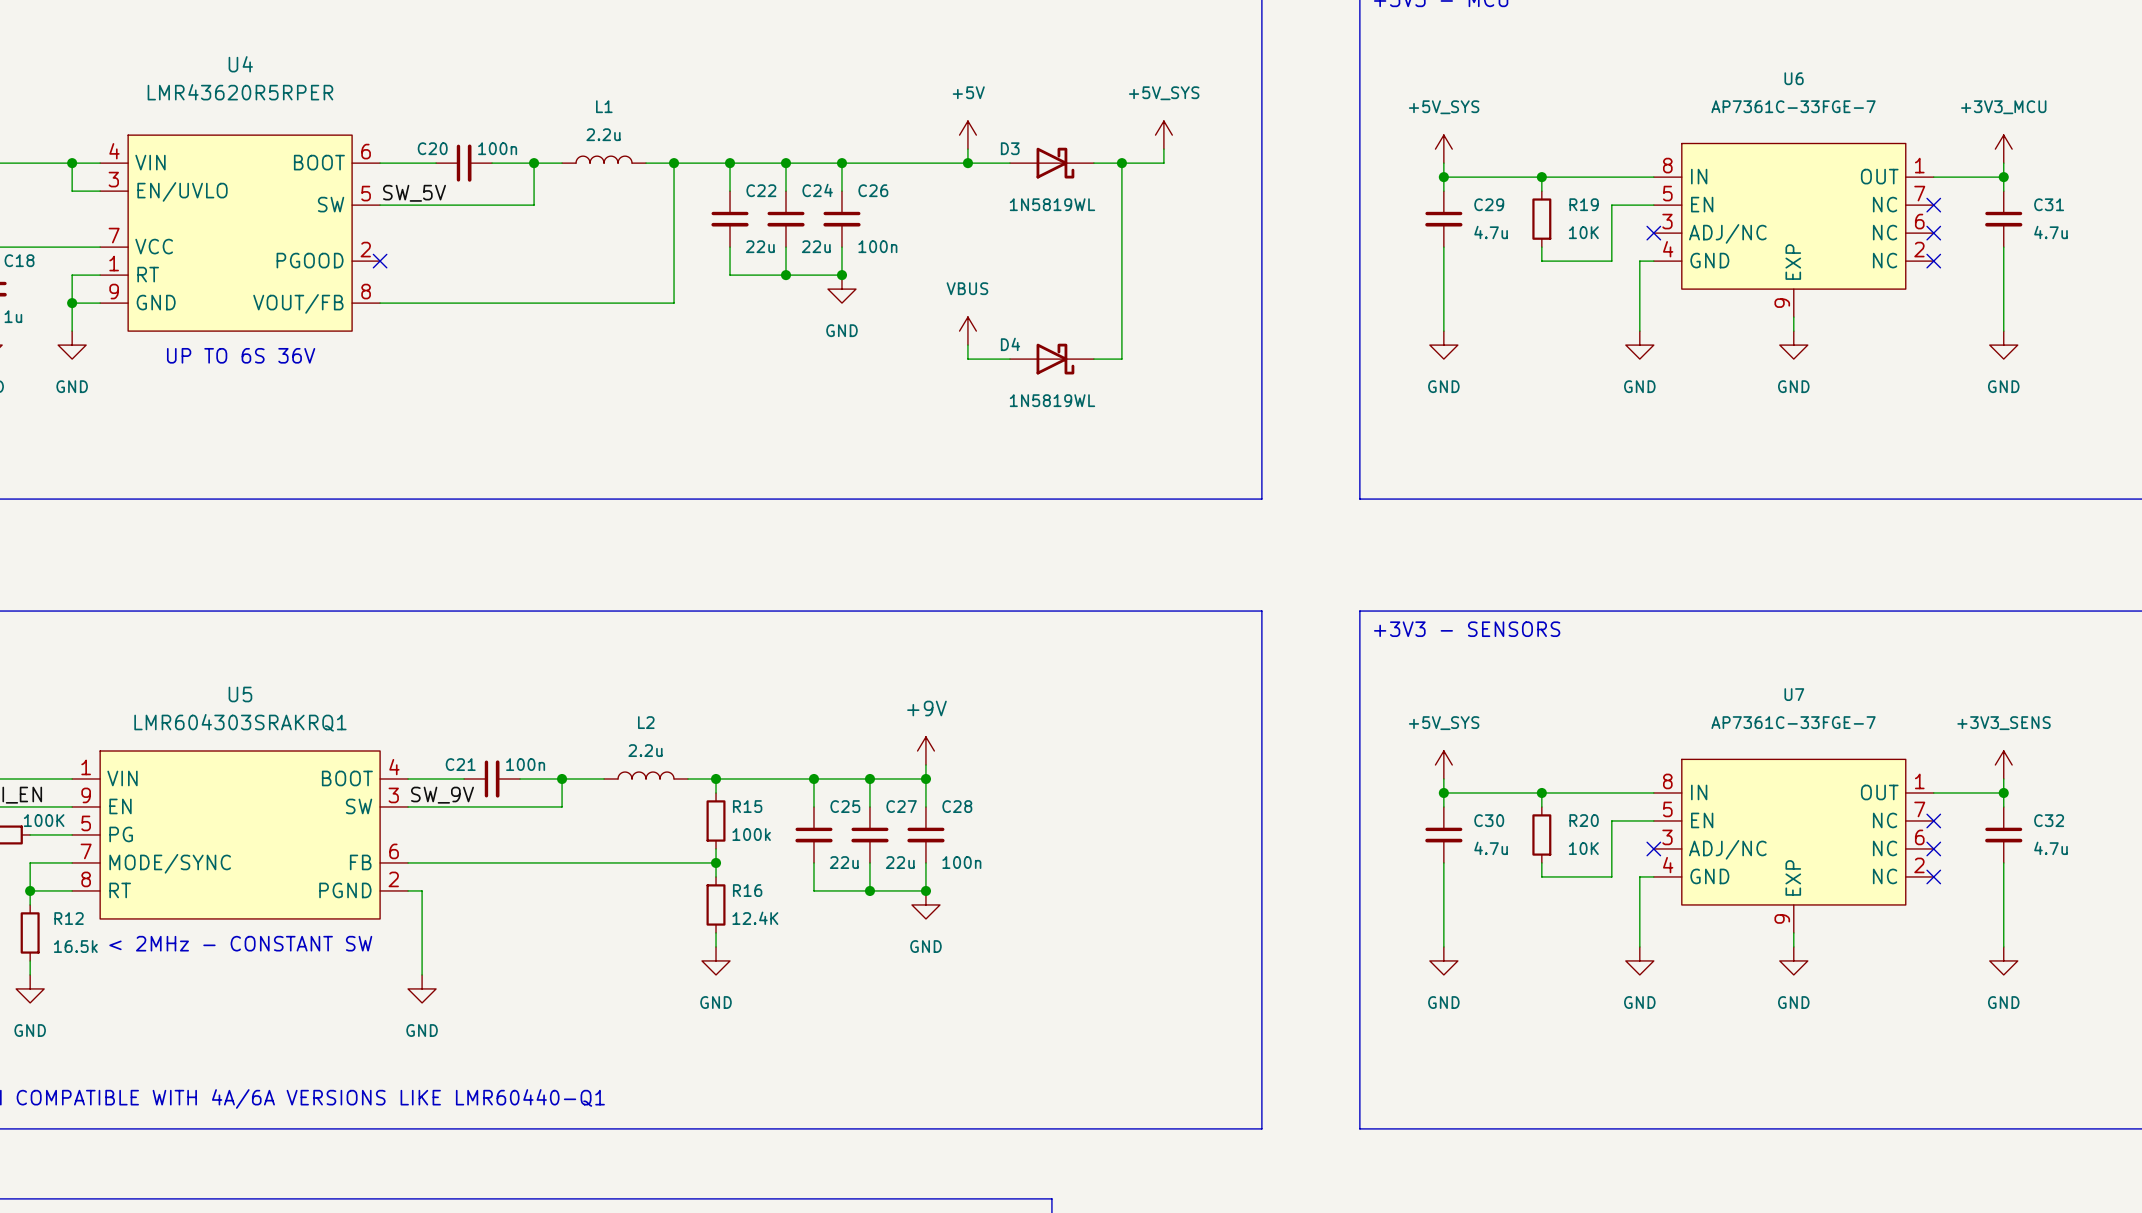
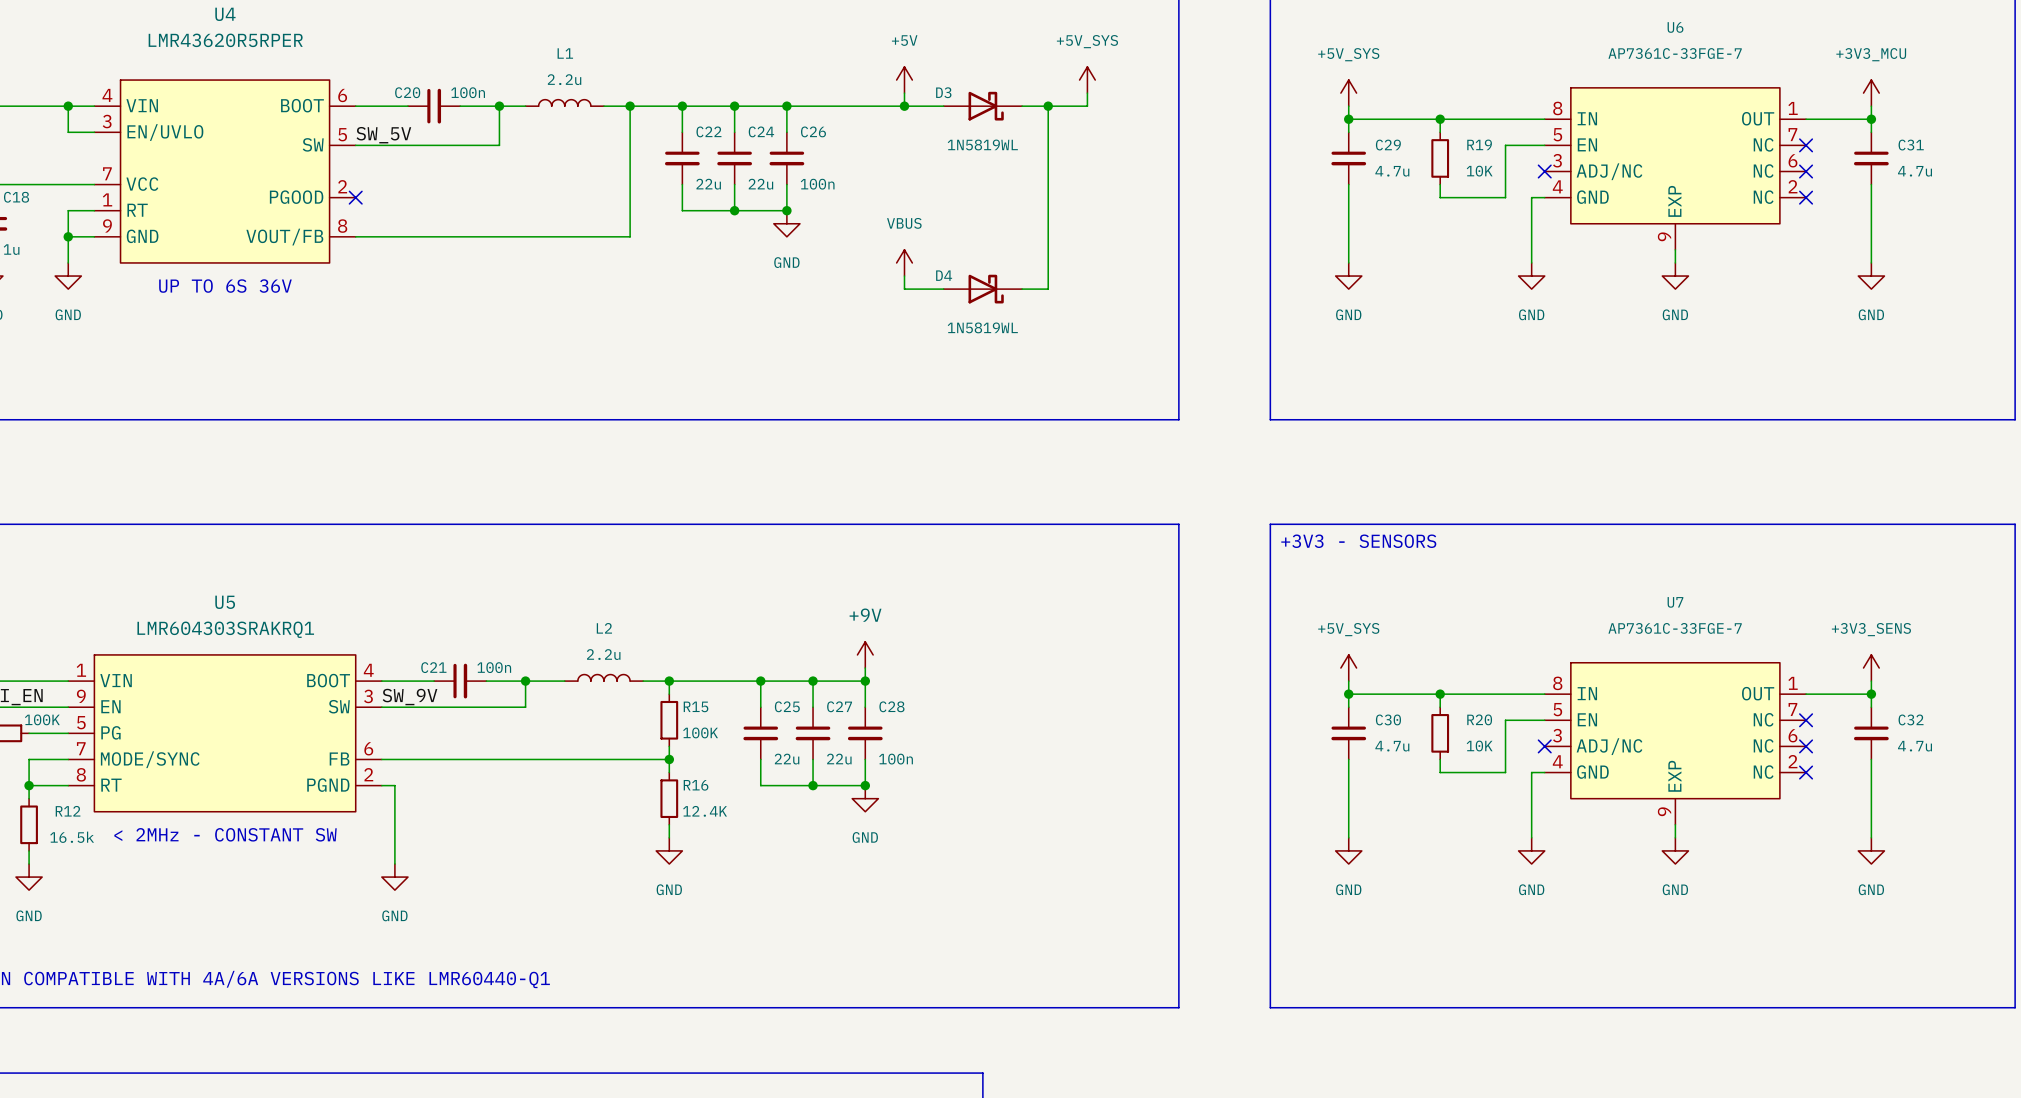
R15 value: 100k (751, 834) -> 100K (700, 732)

